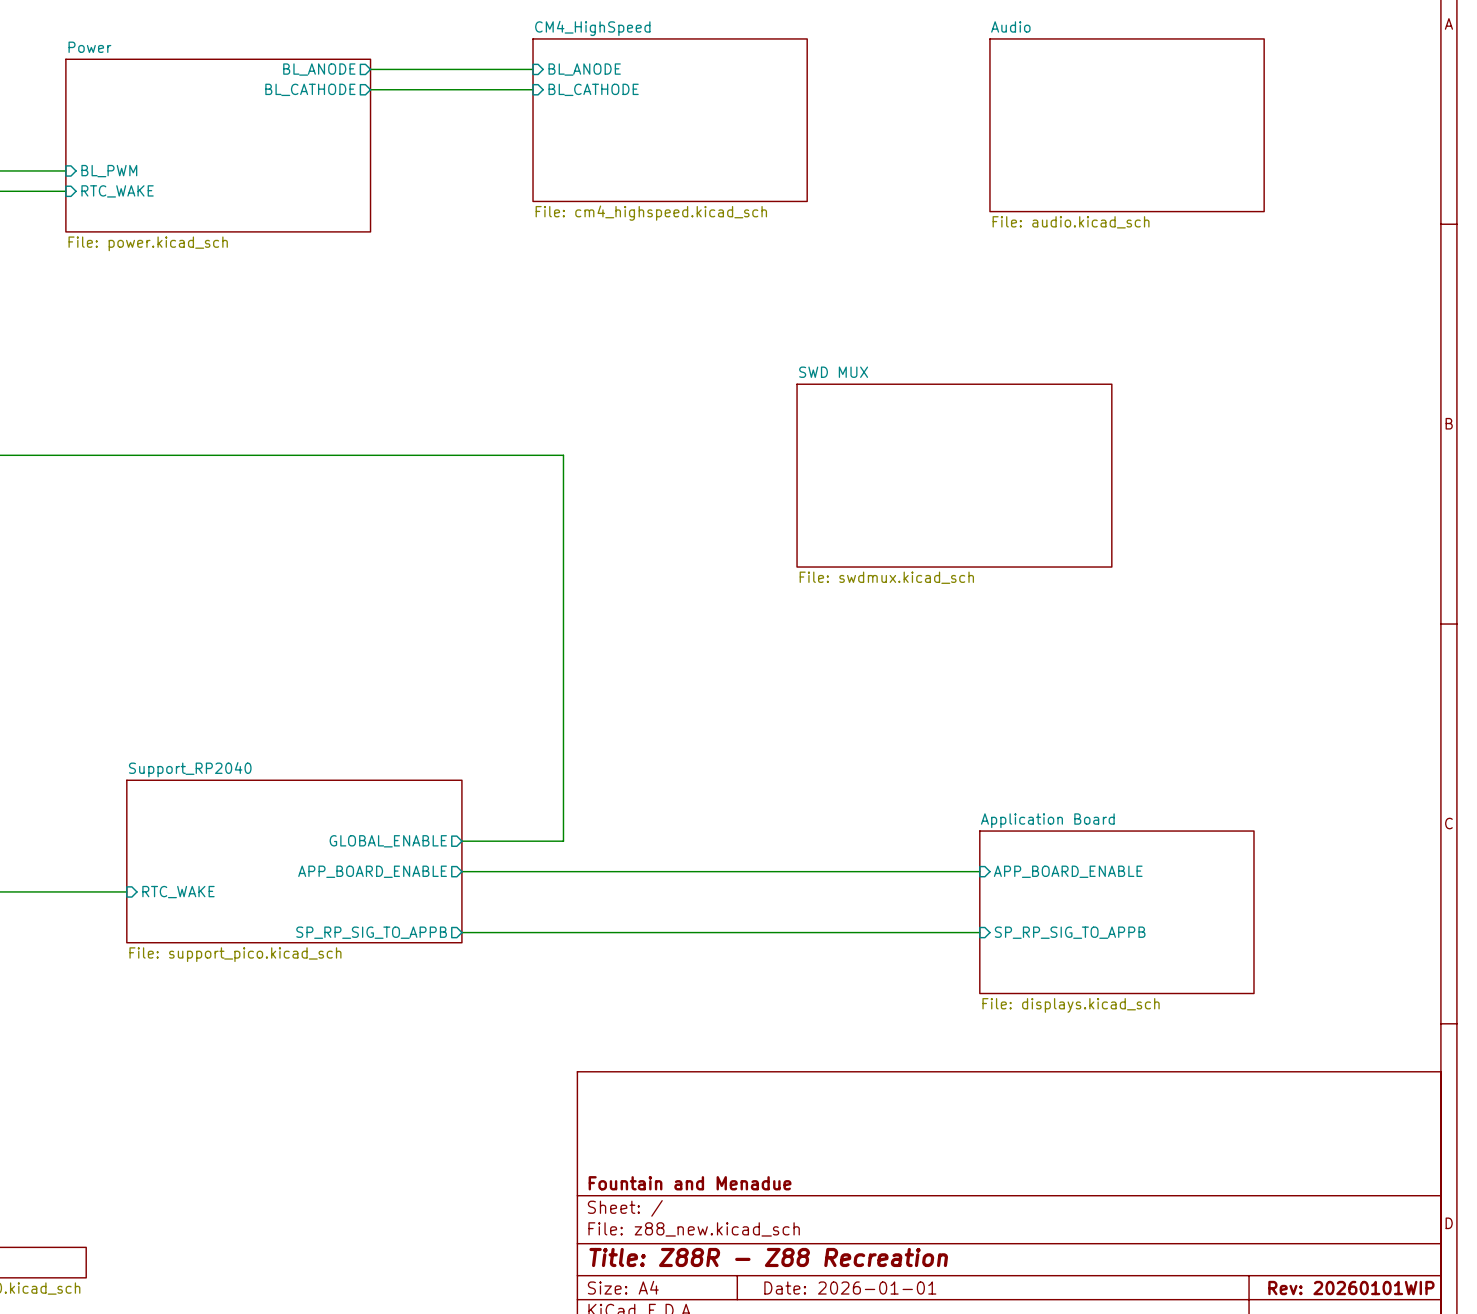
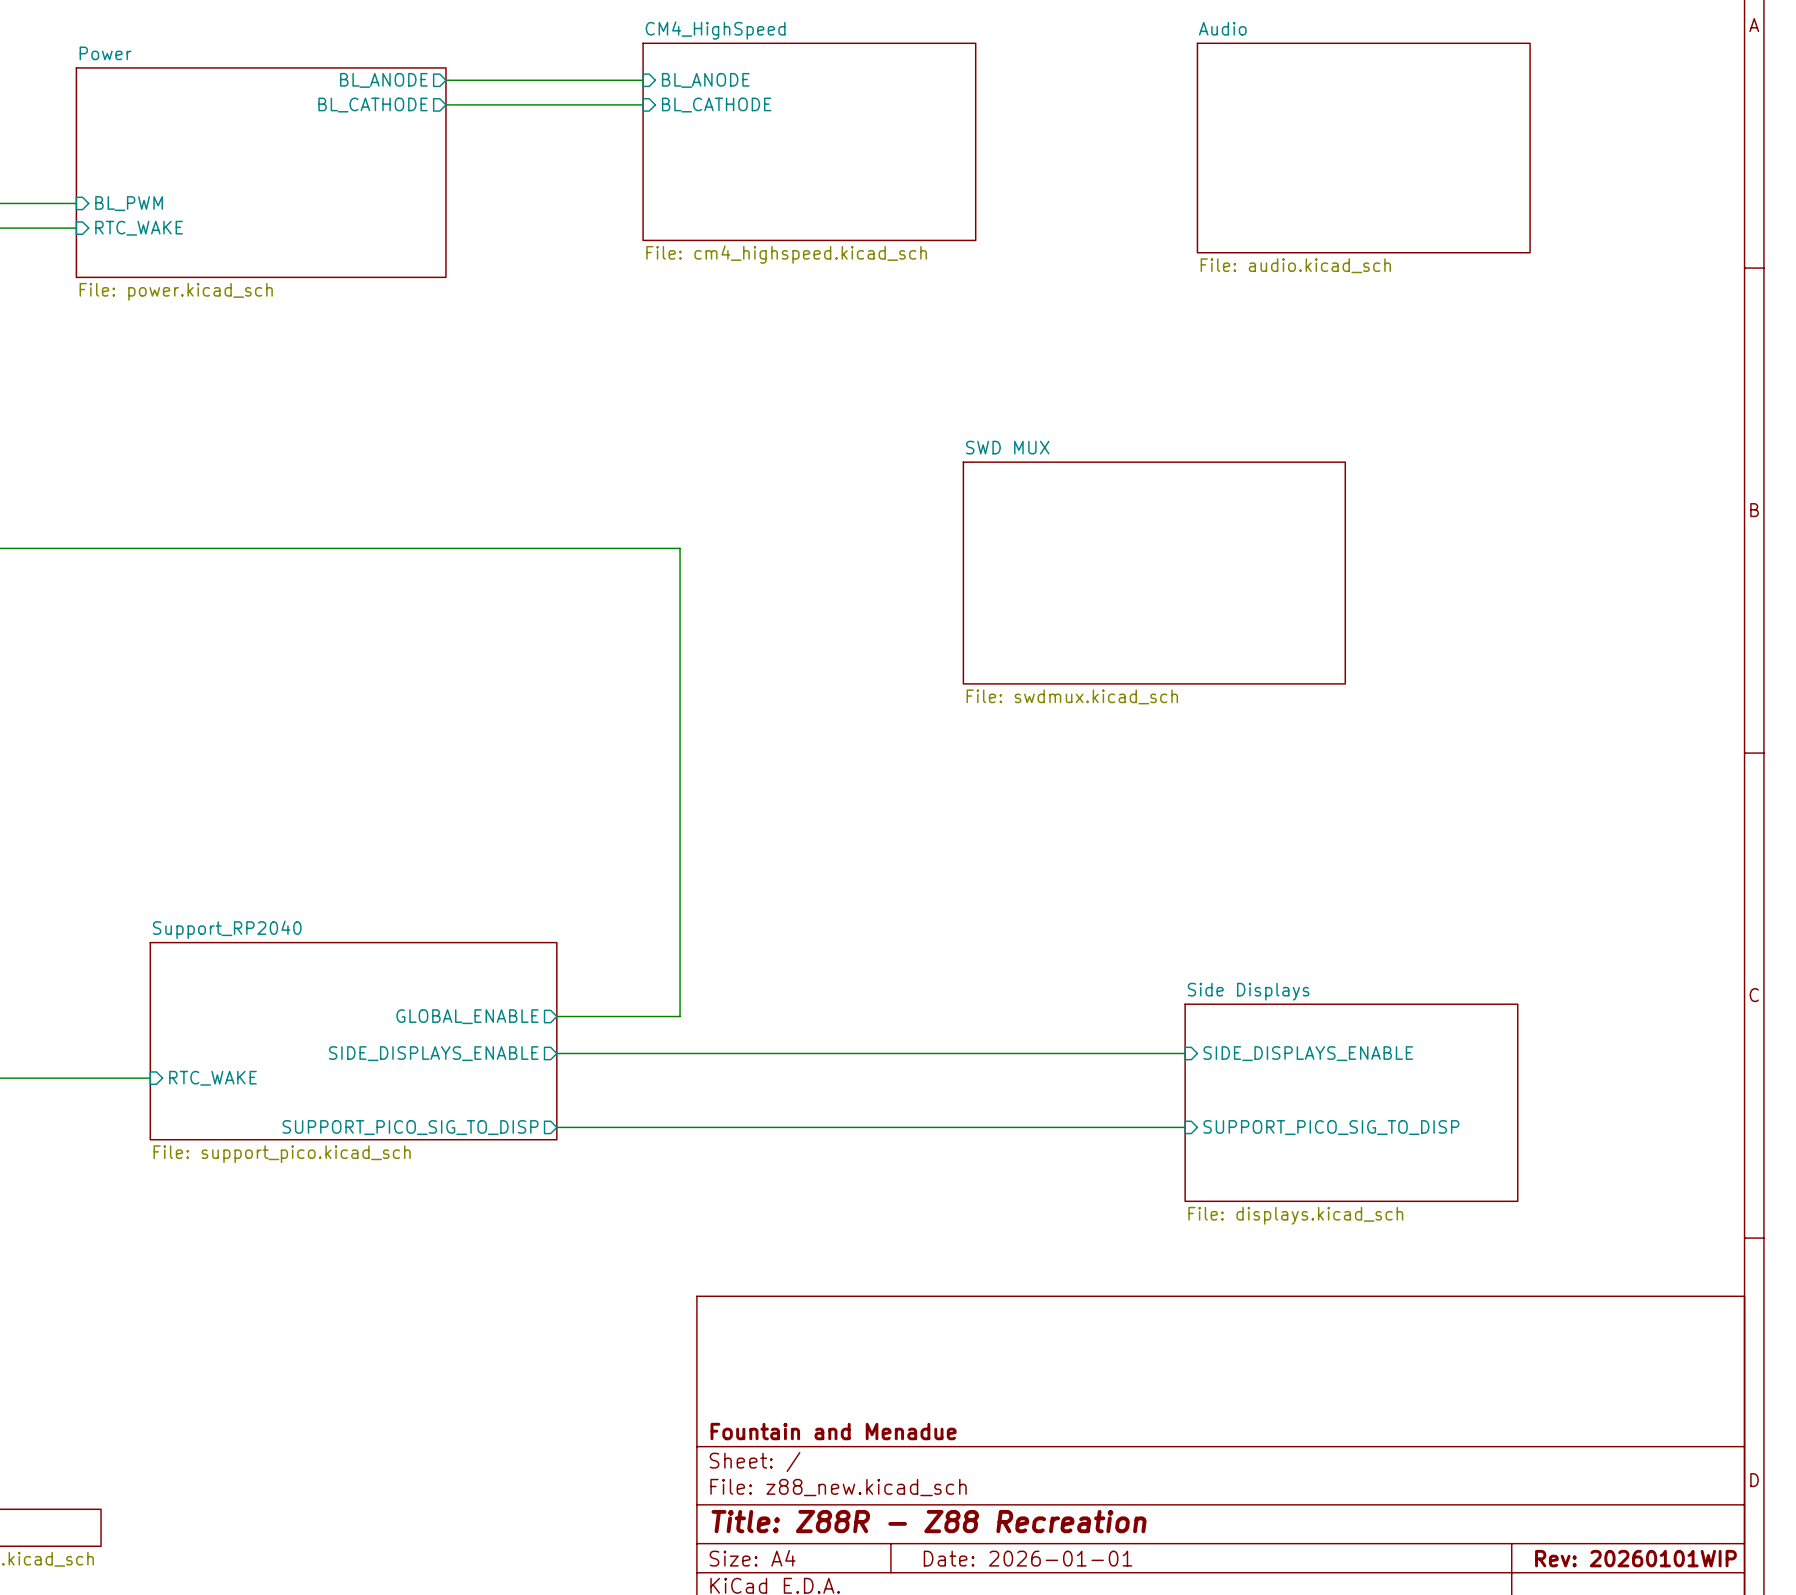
sheet Application Board name: Application Board (1047, 820) -> Side Displays (1248, 991)
sheet pin: APP_BOARD_ENABLE (372, 871) -> SIDE_DISPLAYS_ENABLE (433, 1053)
sheet pin: APP_BOARD_ENABLE (1068, 871) -> SIDE_DISPLAYS_ENABLE (1308, 1053)
sheet pin: SP_RP_SIG_TO_APPB (371, 932) -> SUPPORT_PICO_SIG_TO_DISP (410, 1127)
sheet pin: SP_RP_SIG_TO_APPB (1070, 932) -> SUPPORT_PICO_SIG_TO_DISP (1331, 1127)

